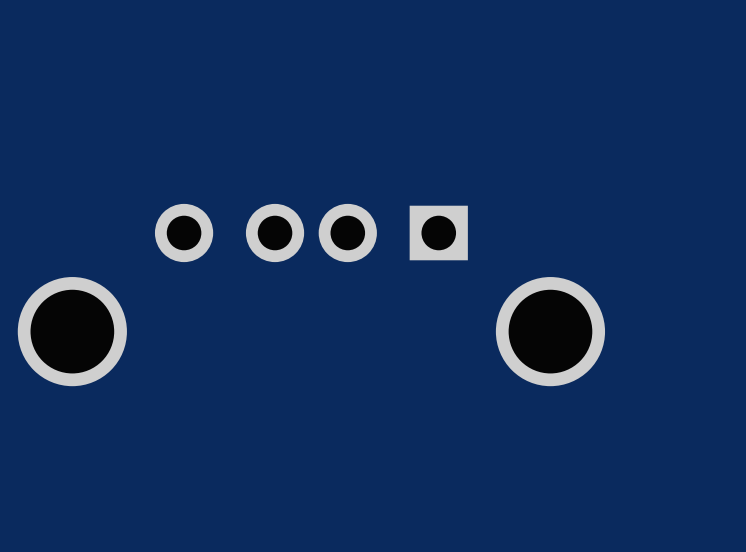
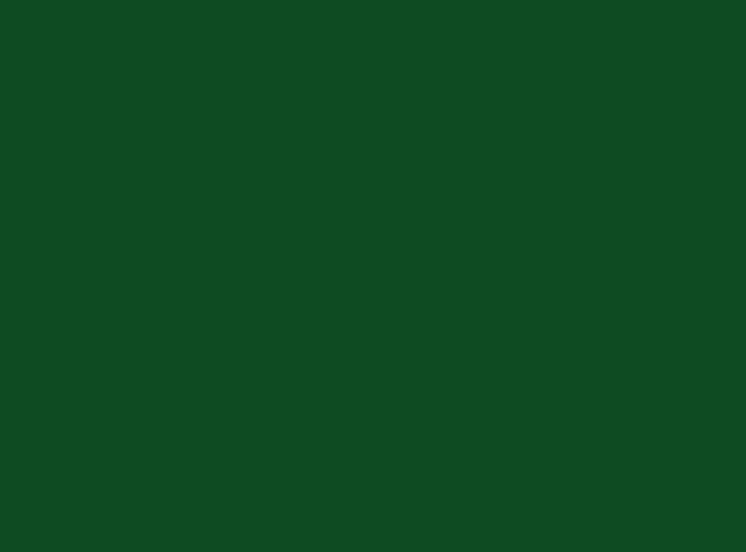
part: (311, 295) -> none

